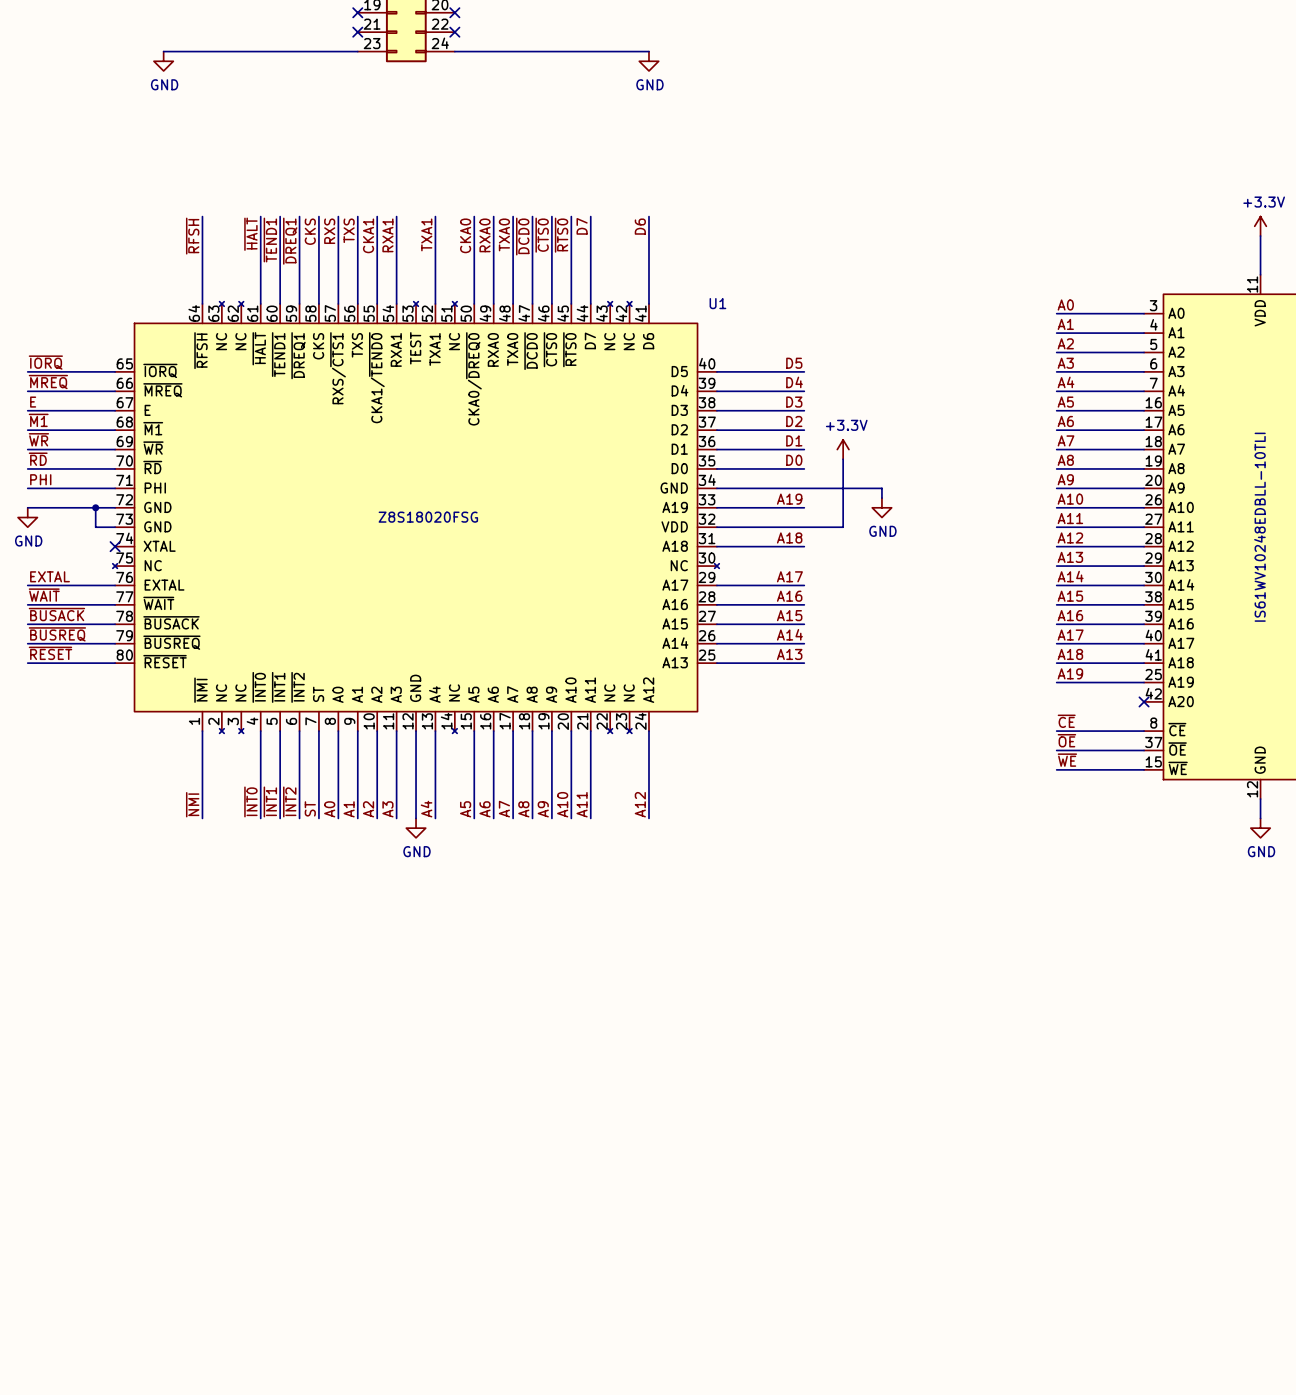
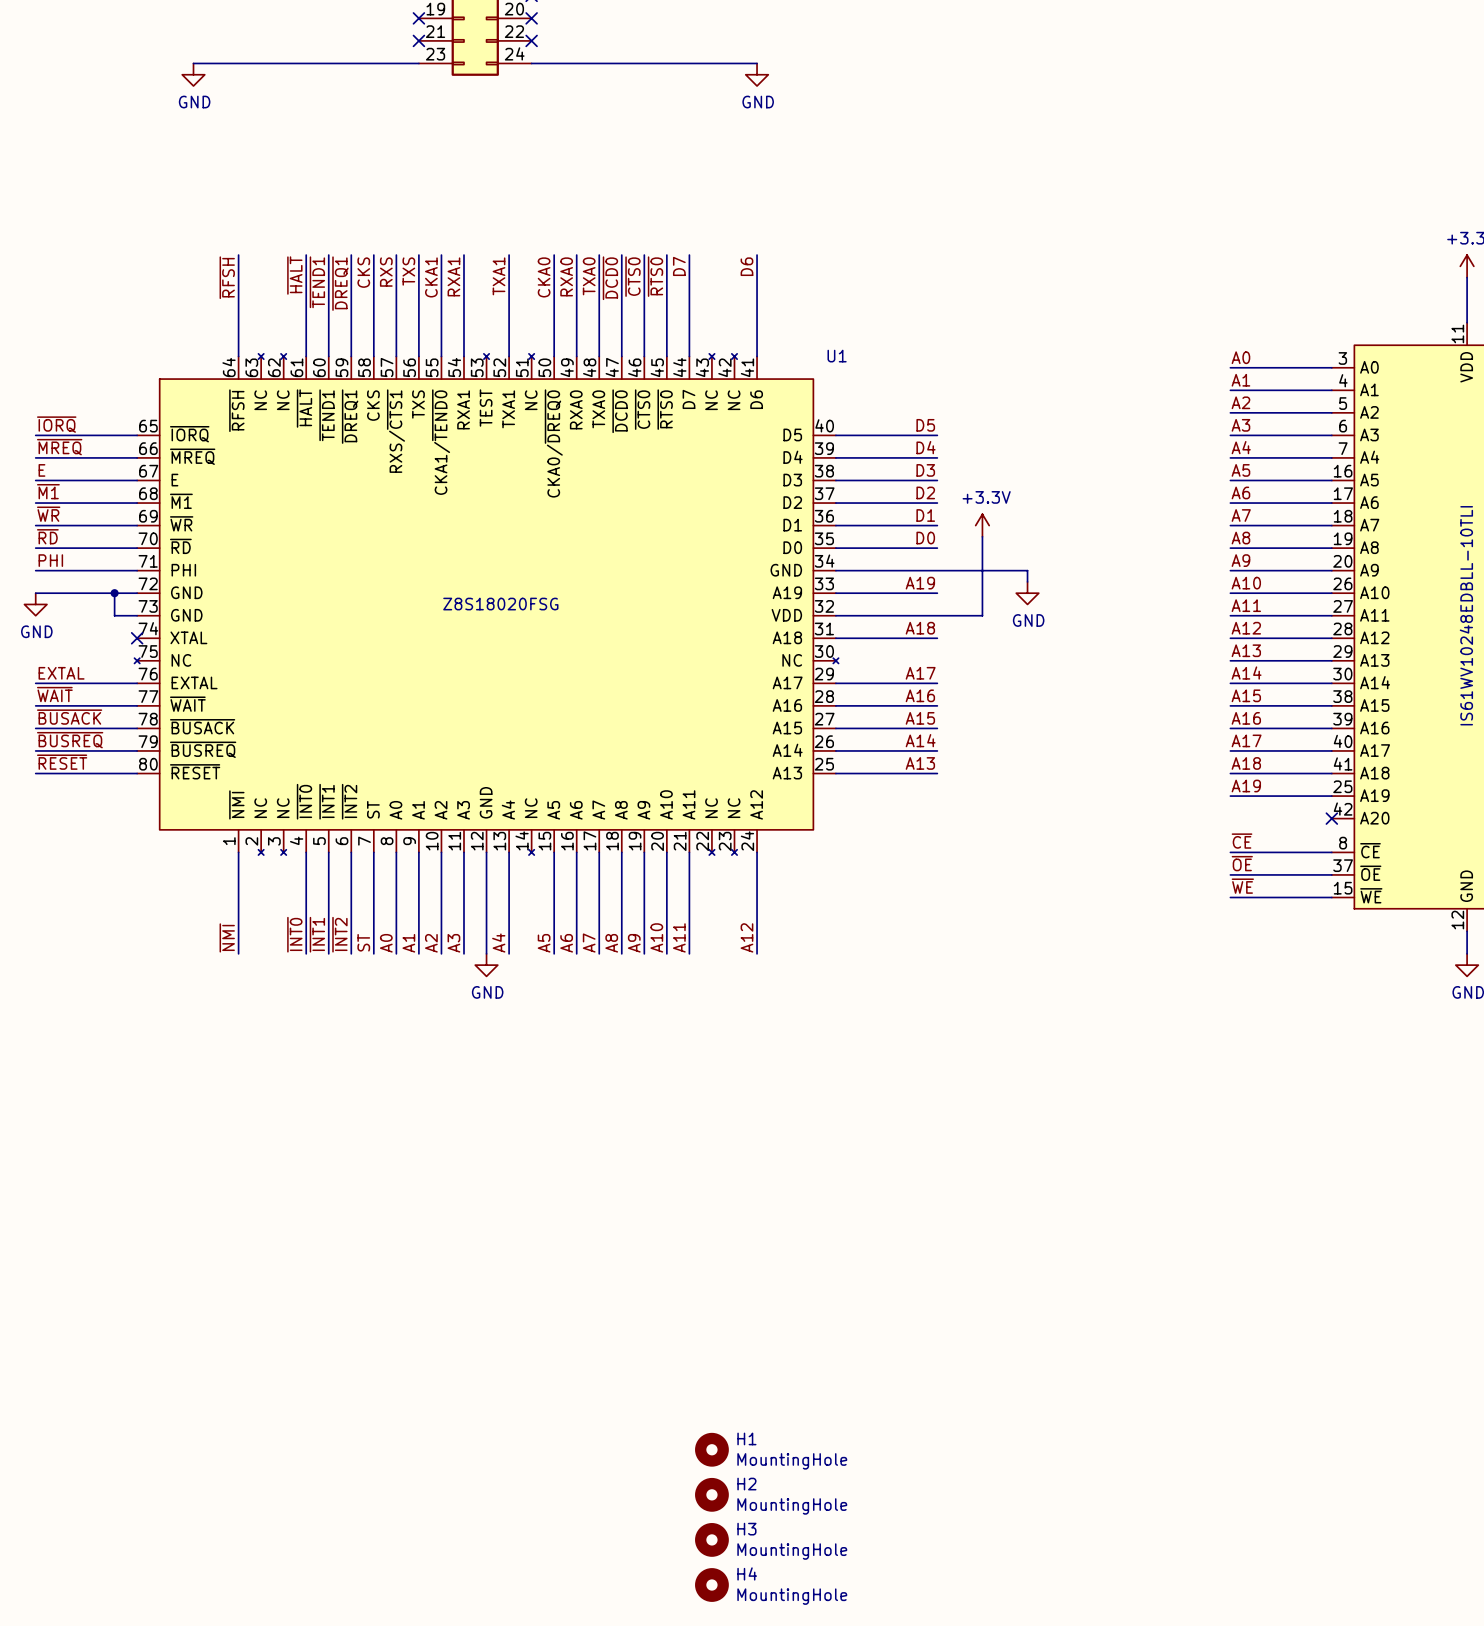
H1: none -> MountingHole (711, 1449)
H2: none -> MountingHole (711, 1494)
H3: none -> MountingHole (711, 1539)
H4: none -> MountingHole (711, 1585)

